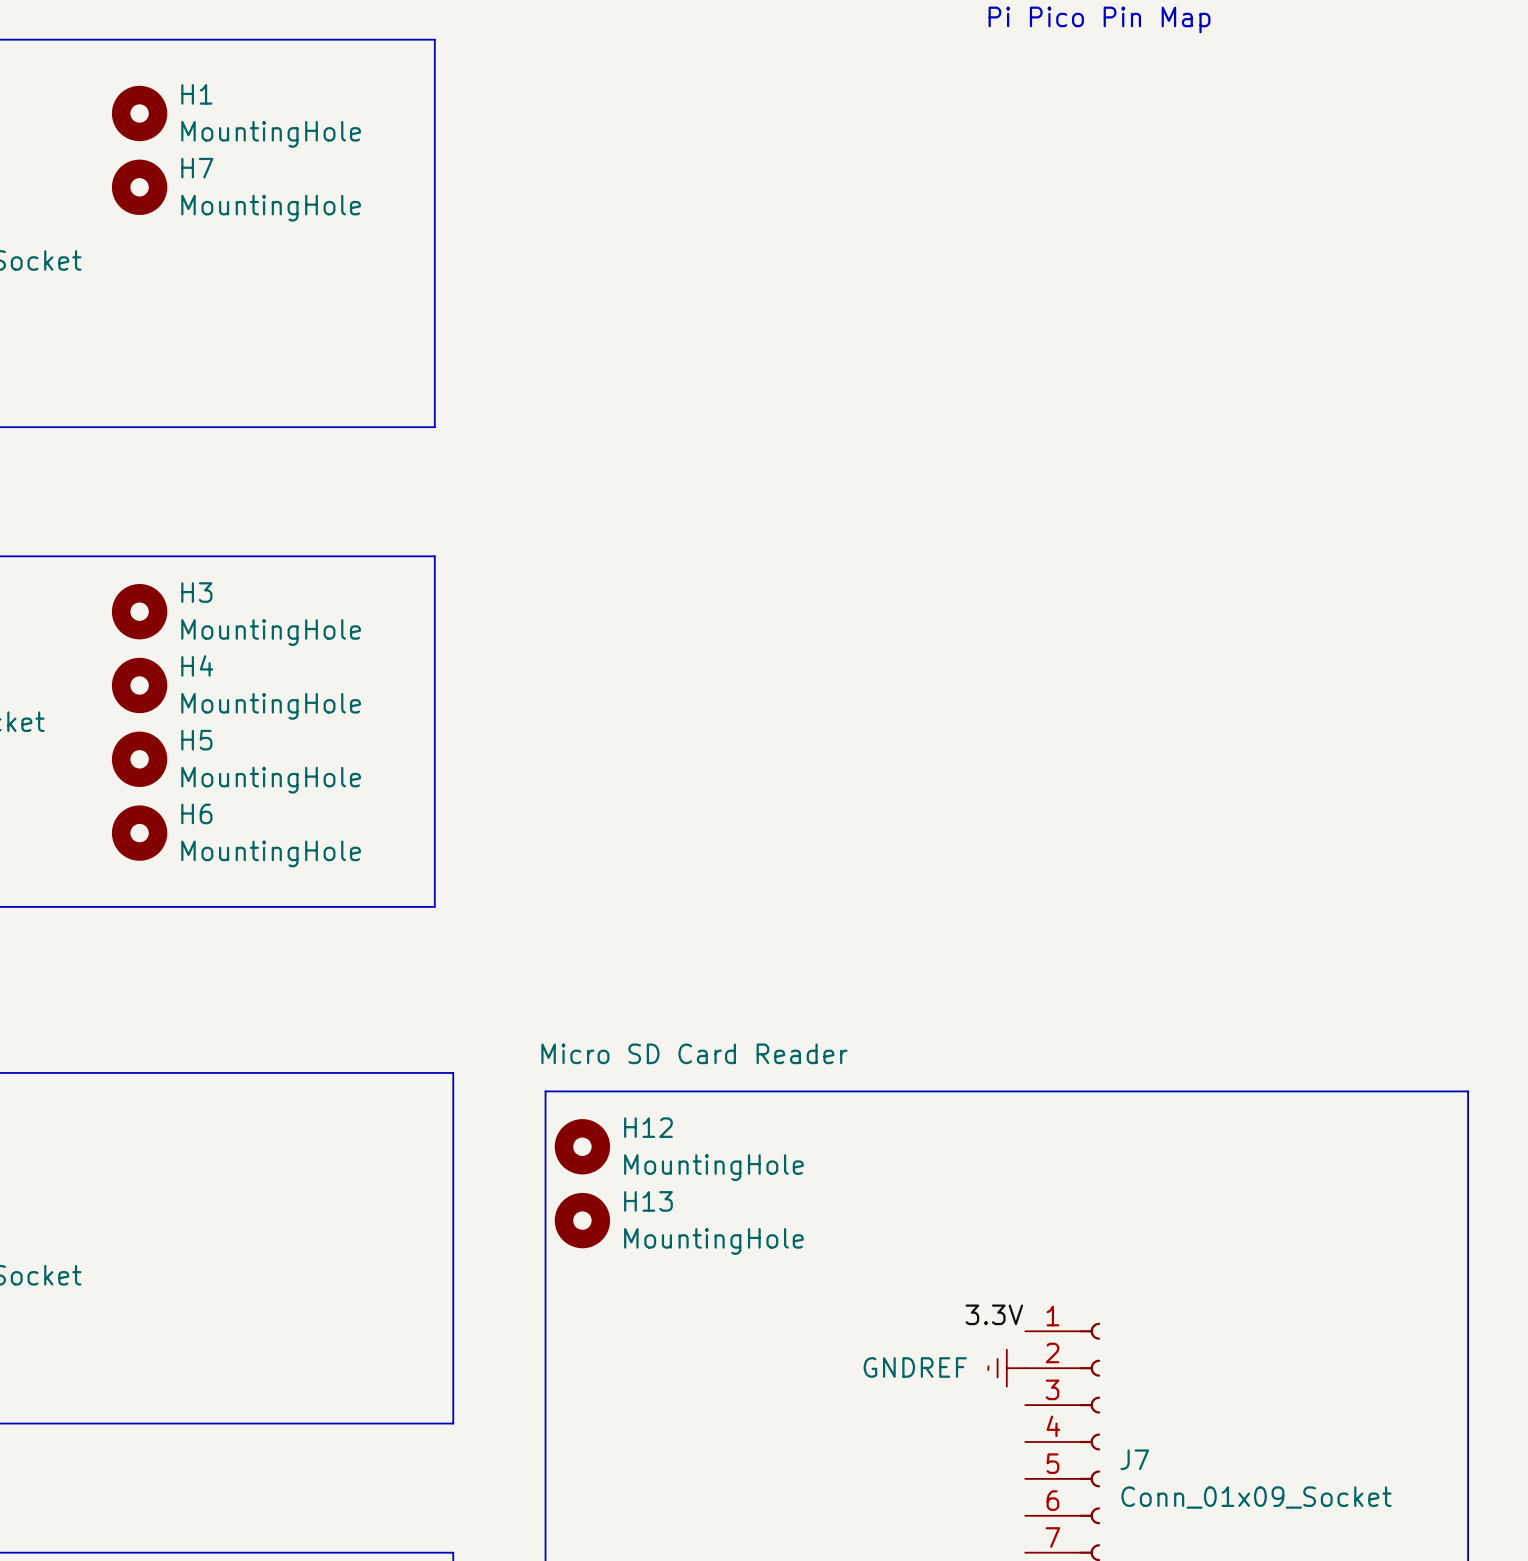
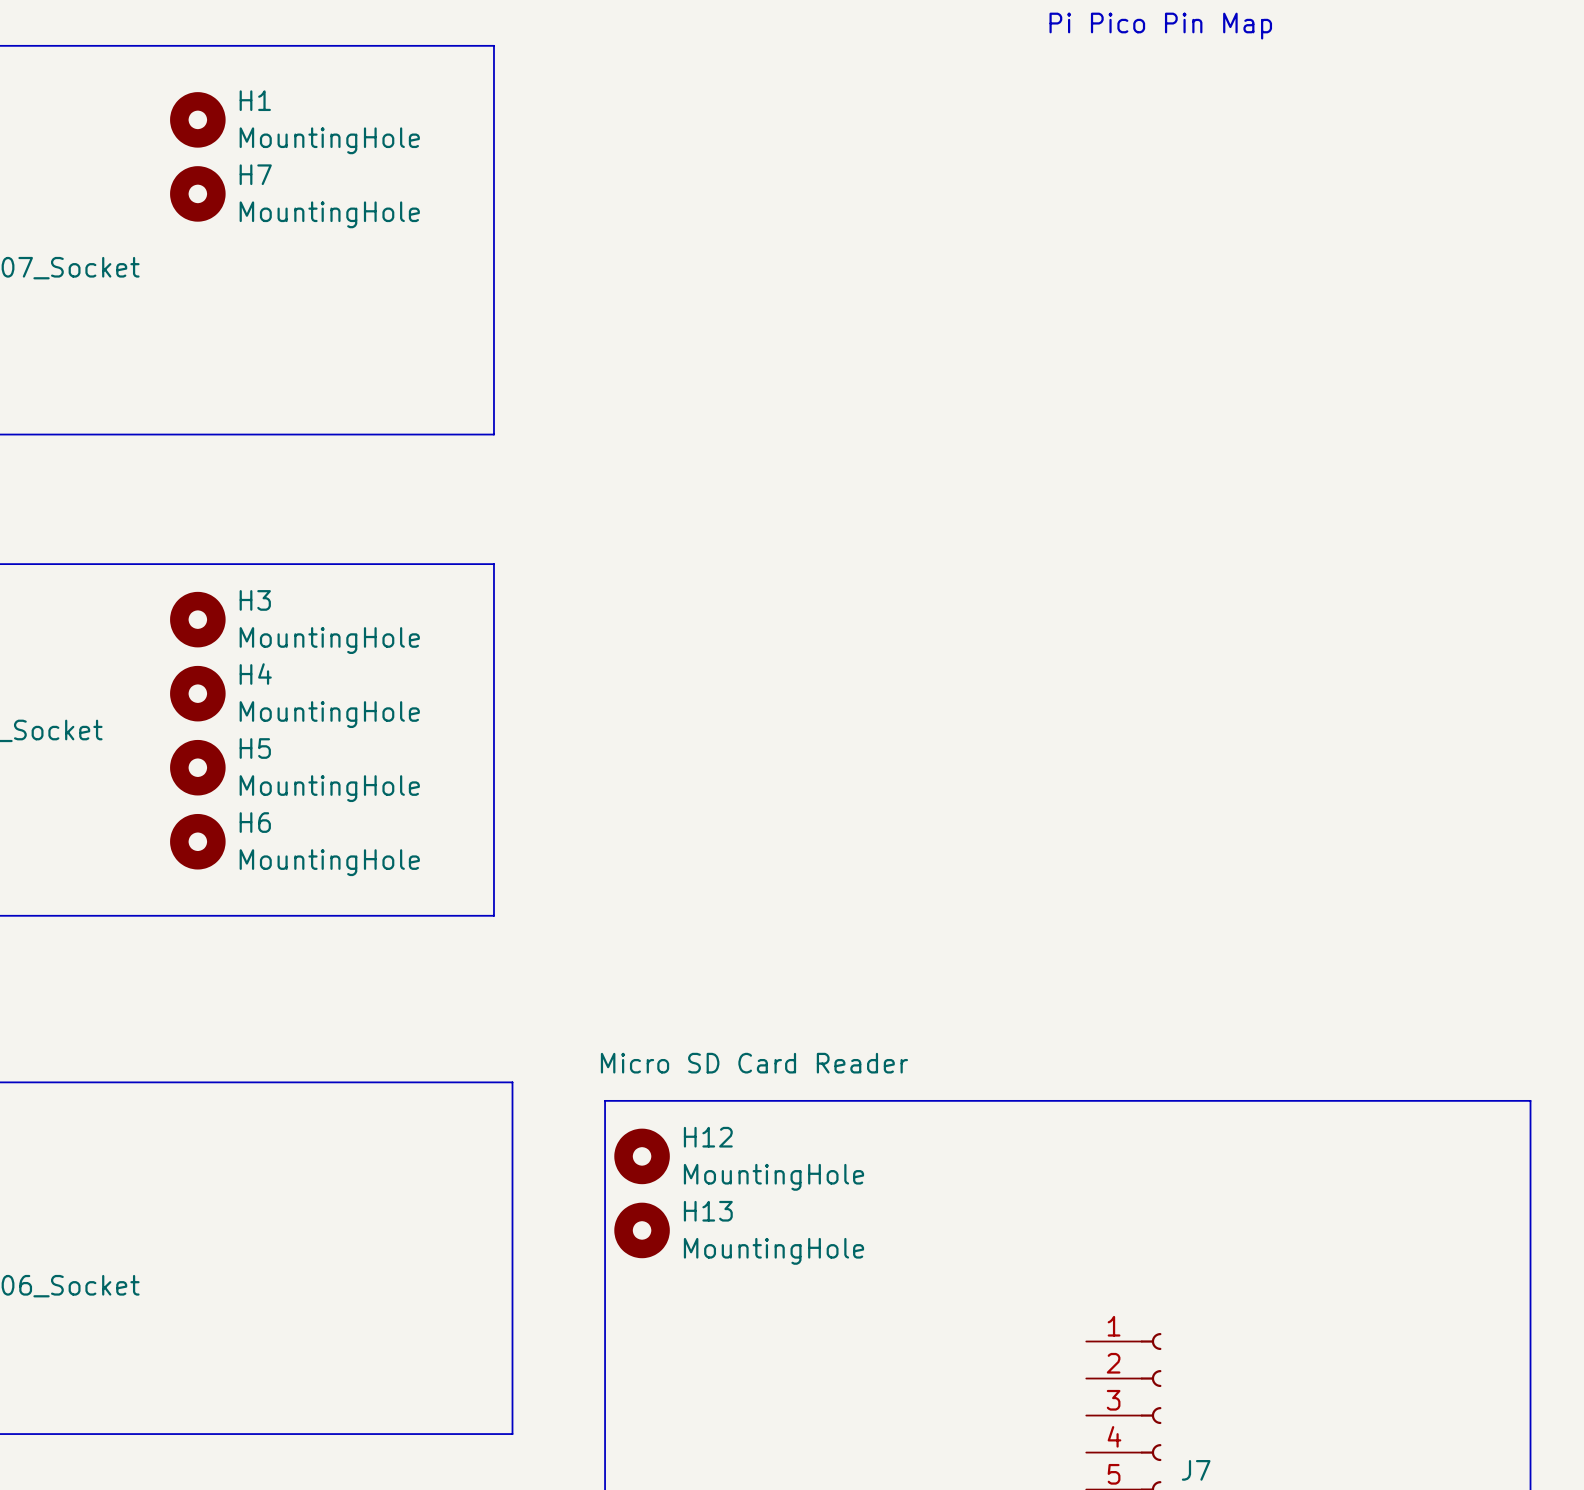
label: 3.3V (994, 1314) -> none
power symbol: GNDREF (1006, 1368) -> none

